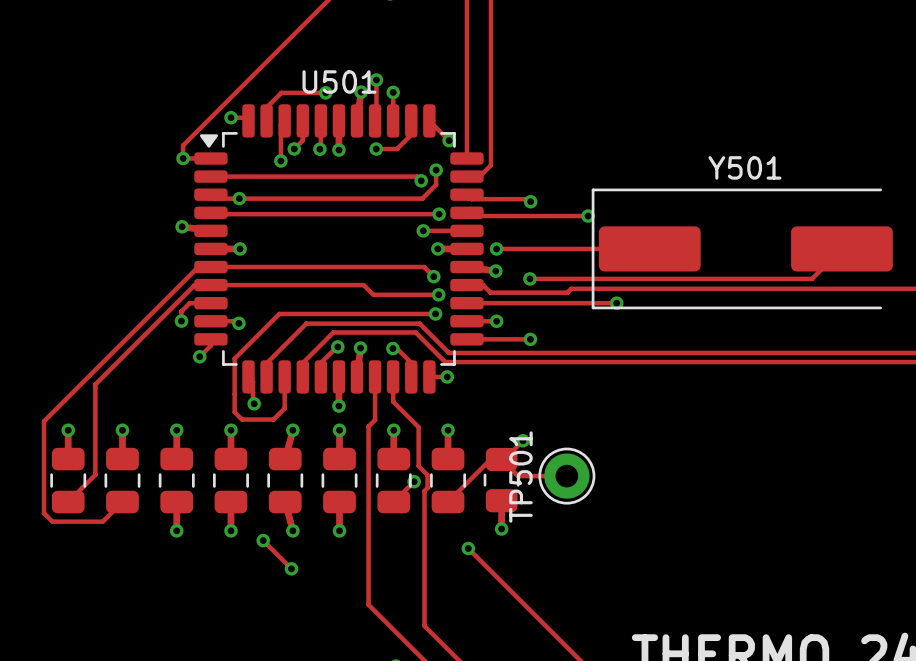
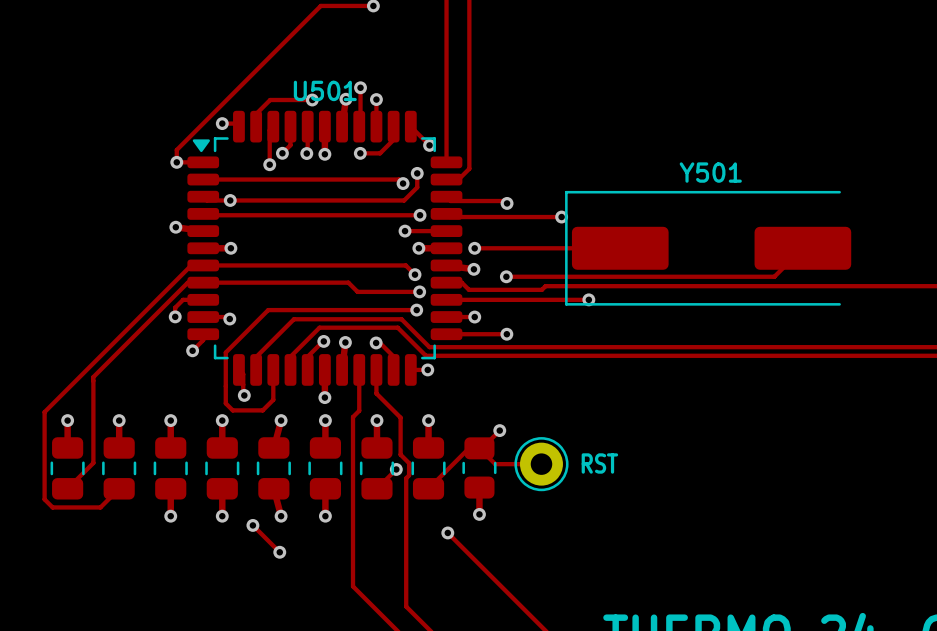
U501 name: U501 (339, 82) -> none
text: none -> U501 (325, 90)
Y501 name: Y501 (744, 167) -> none
text: none -> Y501 (710, 172)
text: none -> RST (599, 463)
TP501 name: TP501 (520, 477) -> none

